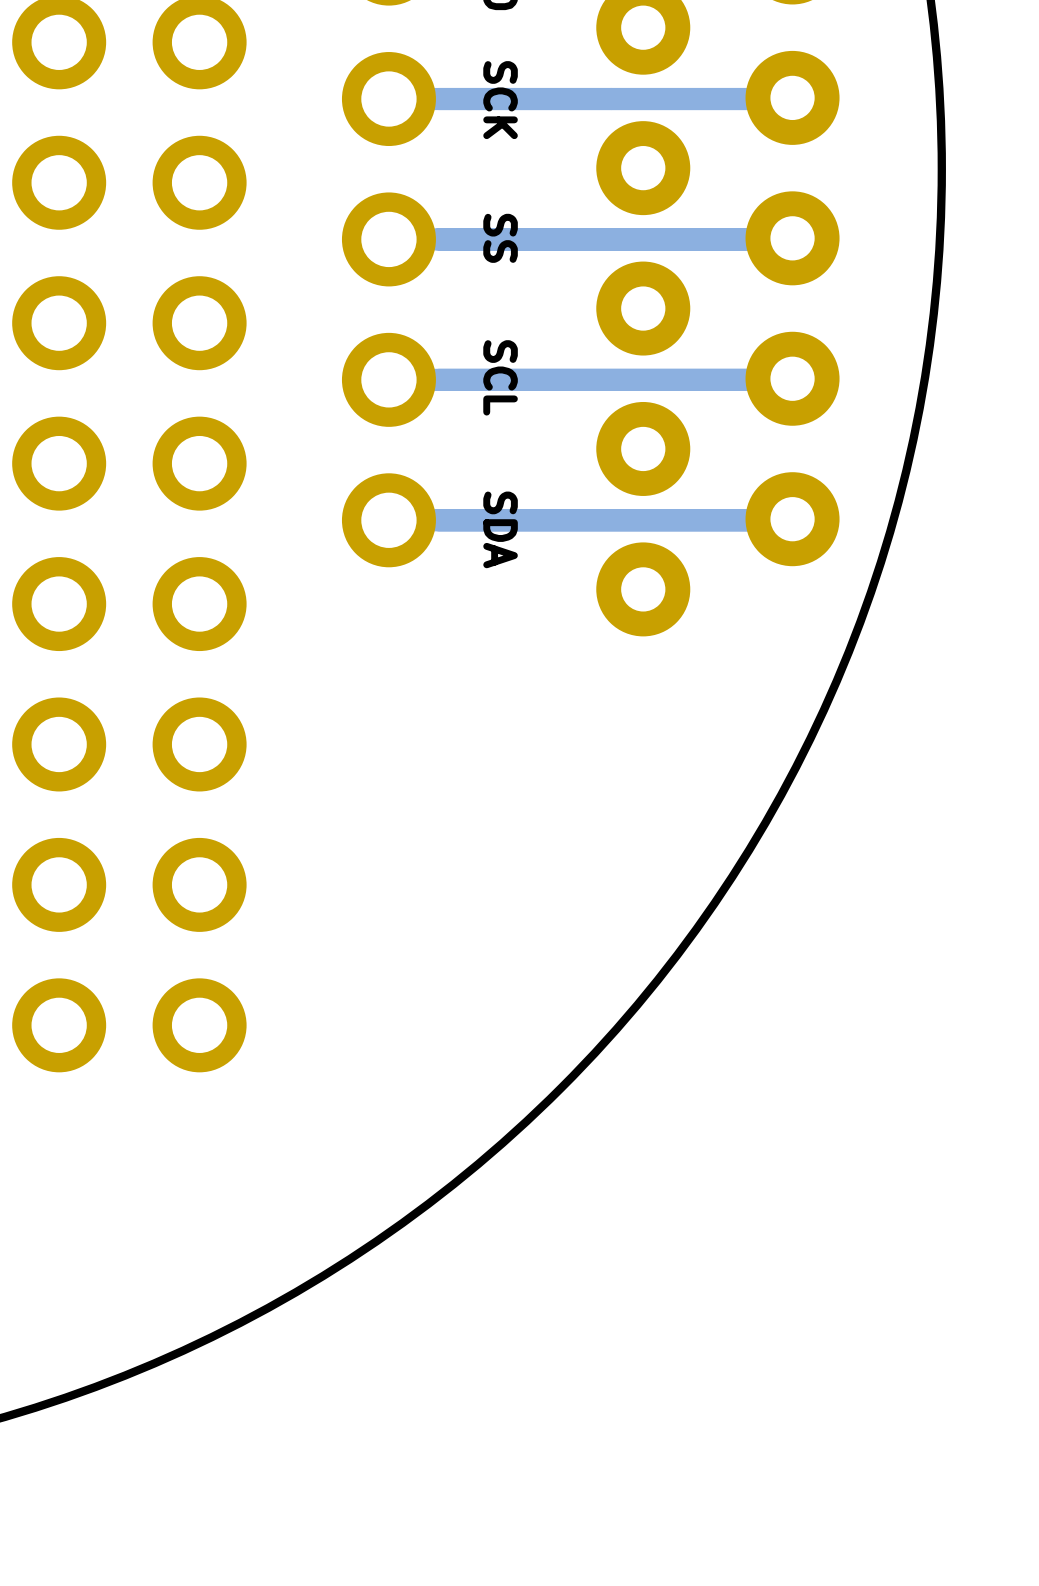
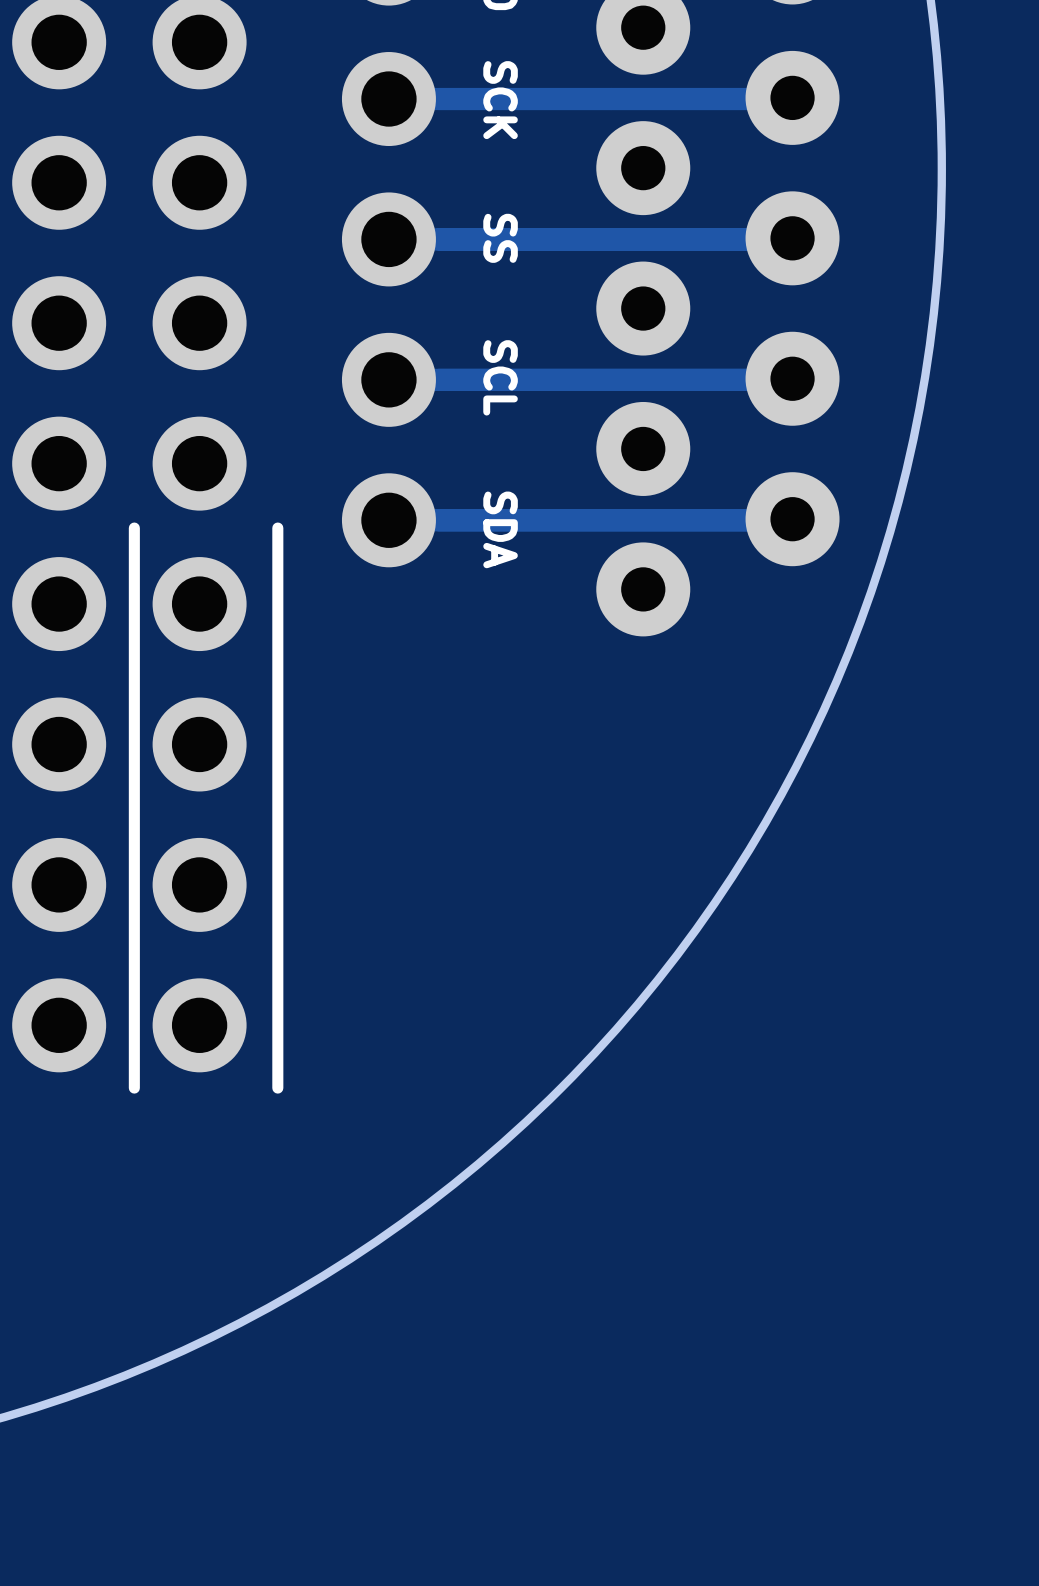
line: none -> (134, 528) (134, 1088)
line: none -> (277, 528) (277, 1088)

